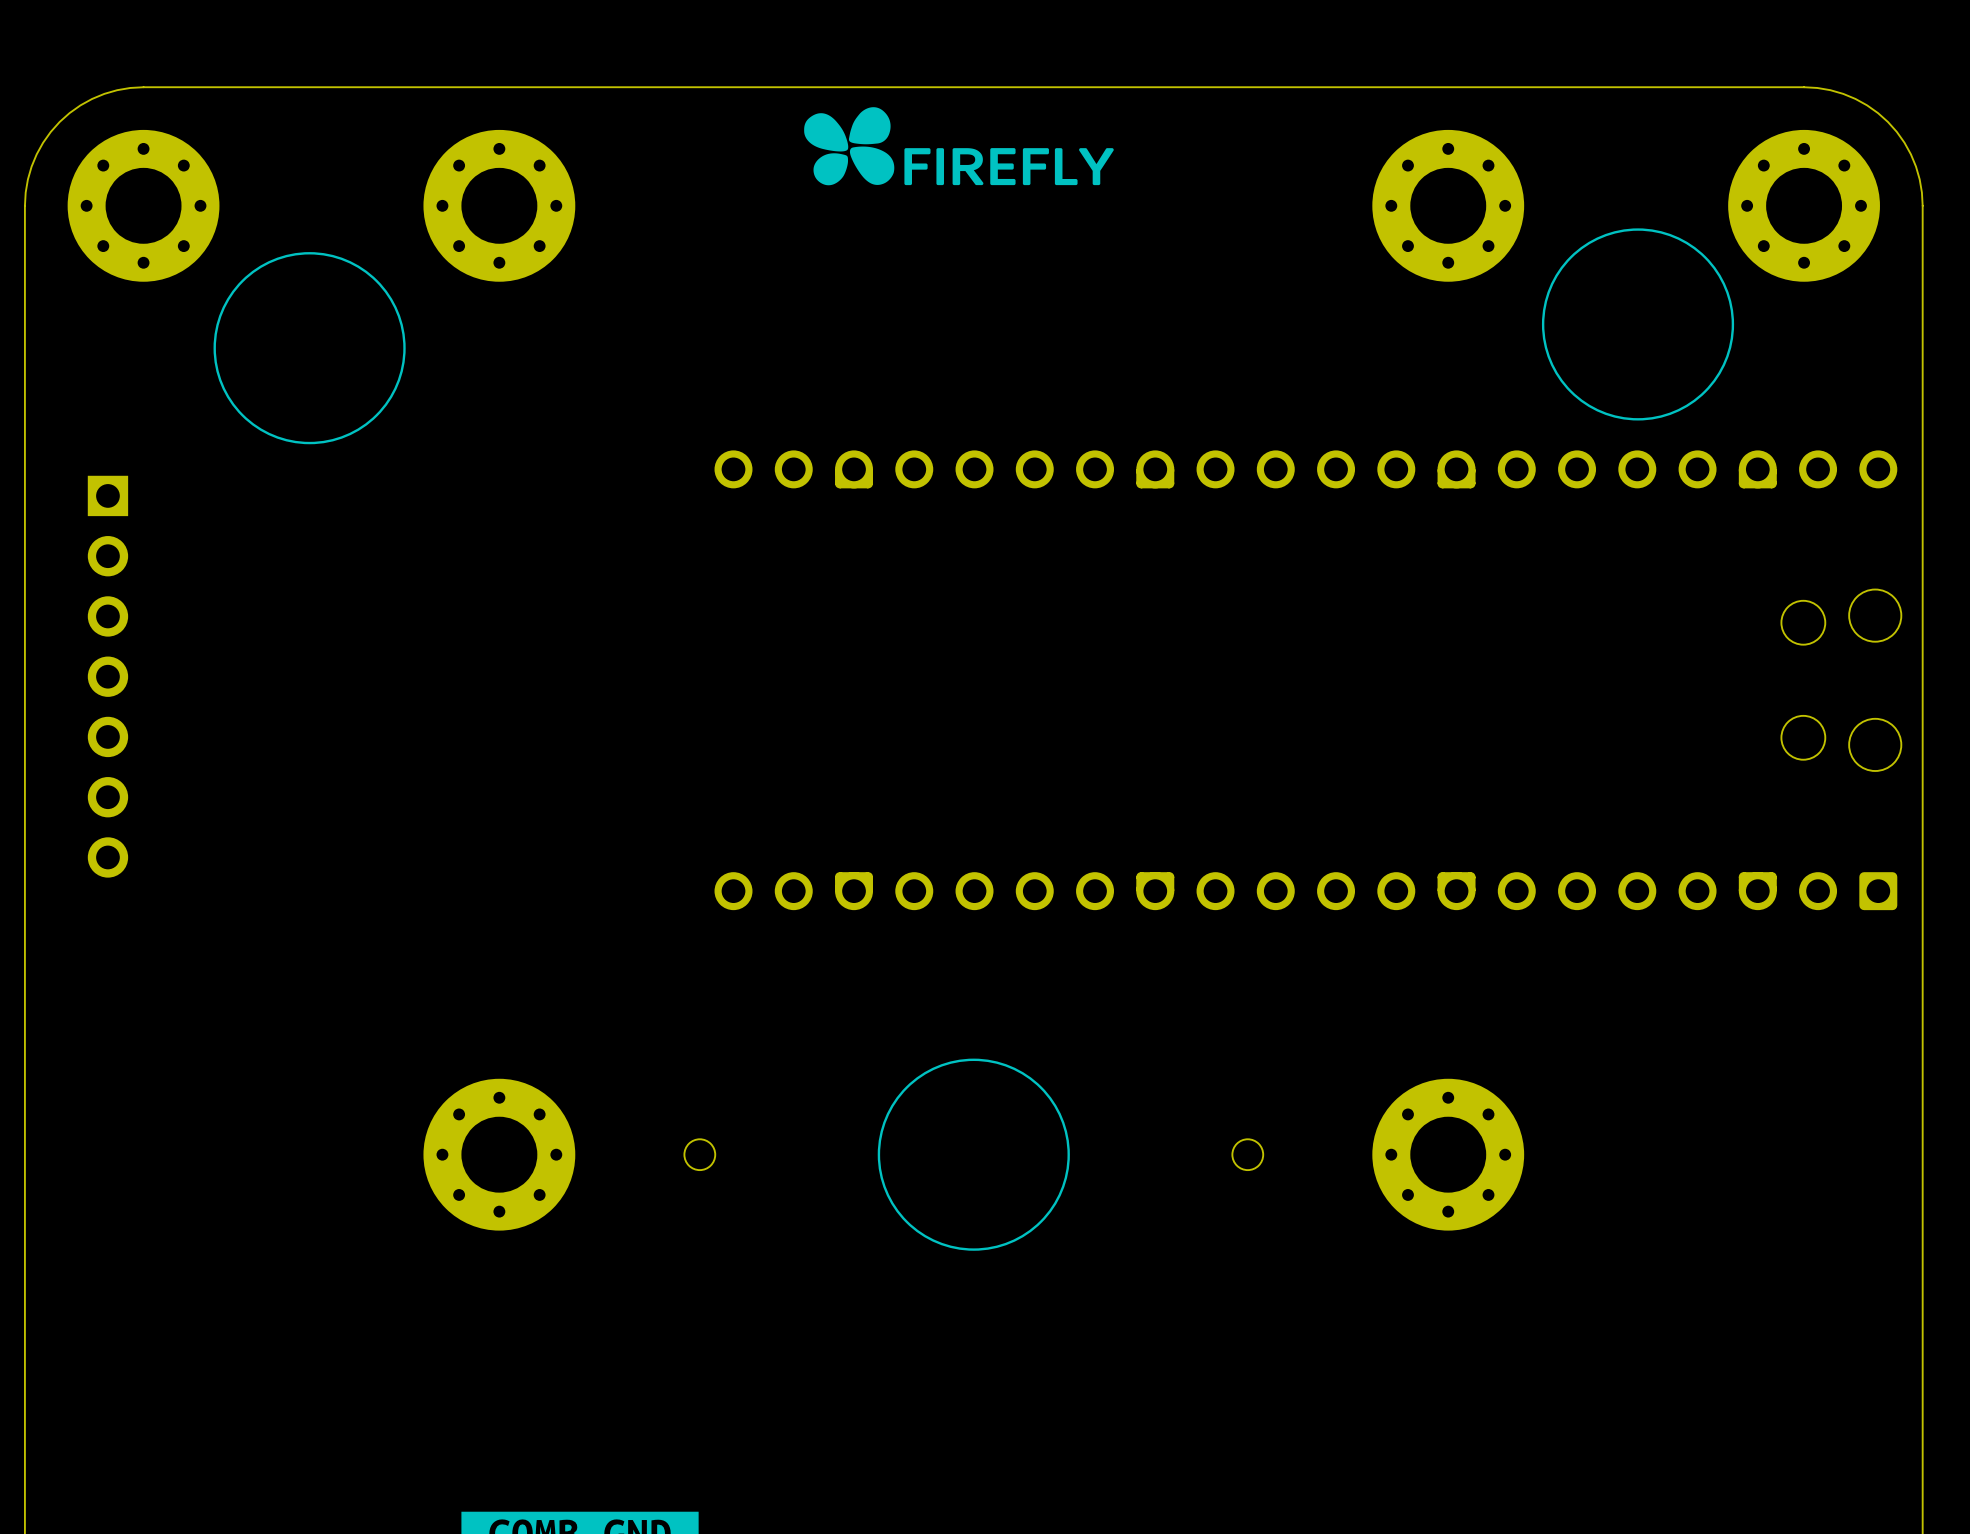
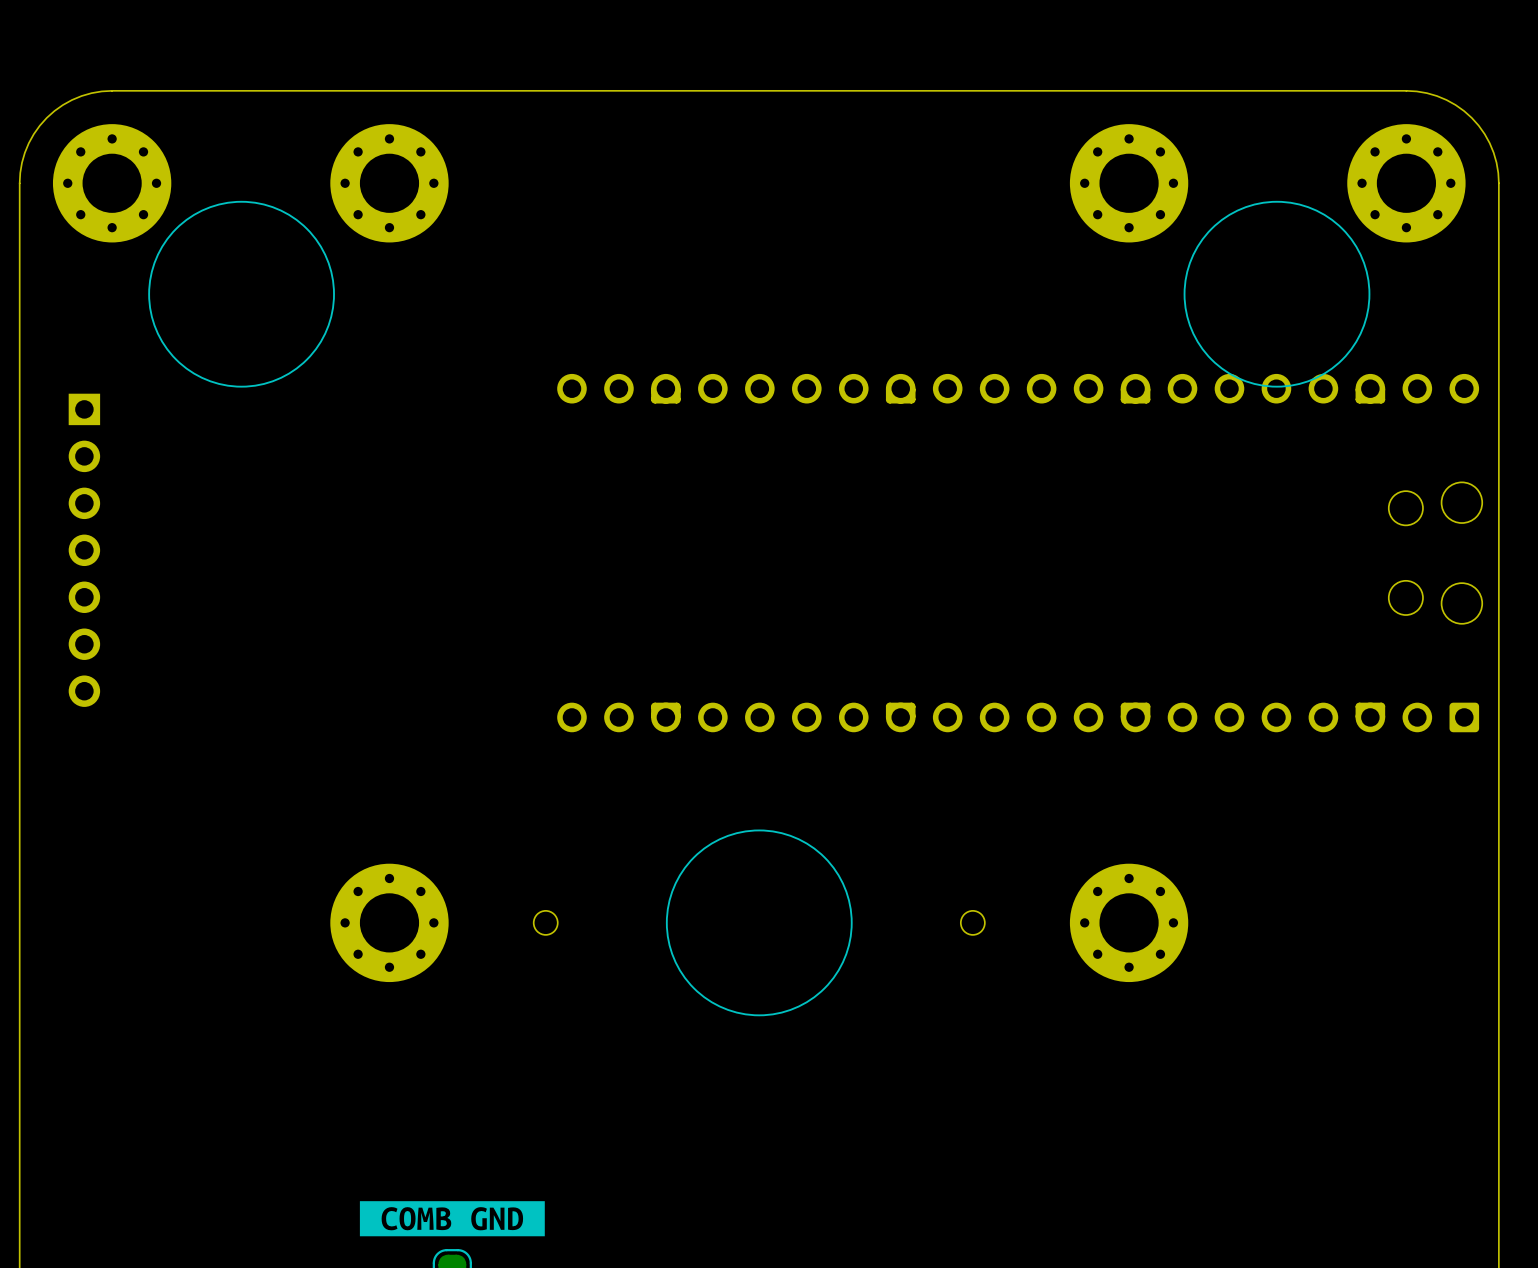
drawing: [804, 107, 1114, 186] -> none
drawing shape: [1541, 228, 1735, 421] -> [1183, 200, 1371, 388]
drawing shape: [213, 252, 406, 445] -> [148, 200, 335, 388]
drawing shape: [877, 1058, 1070, 1251] -> [665, 829, 853, 1017]

